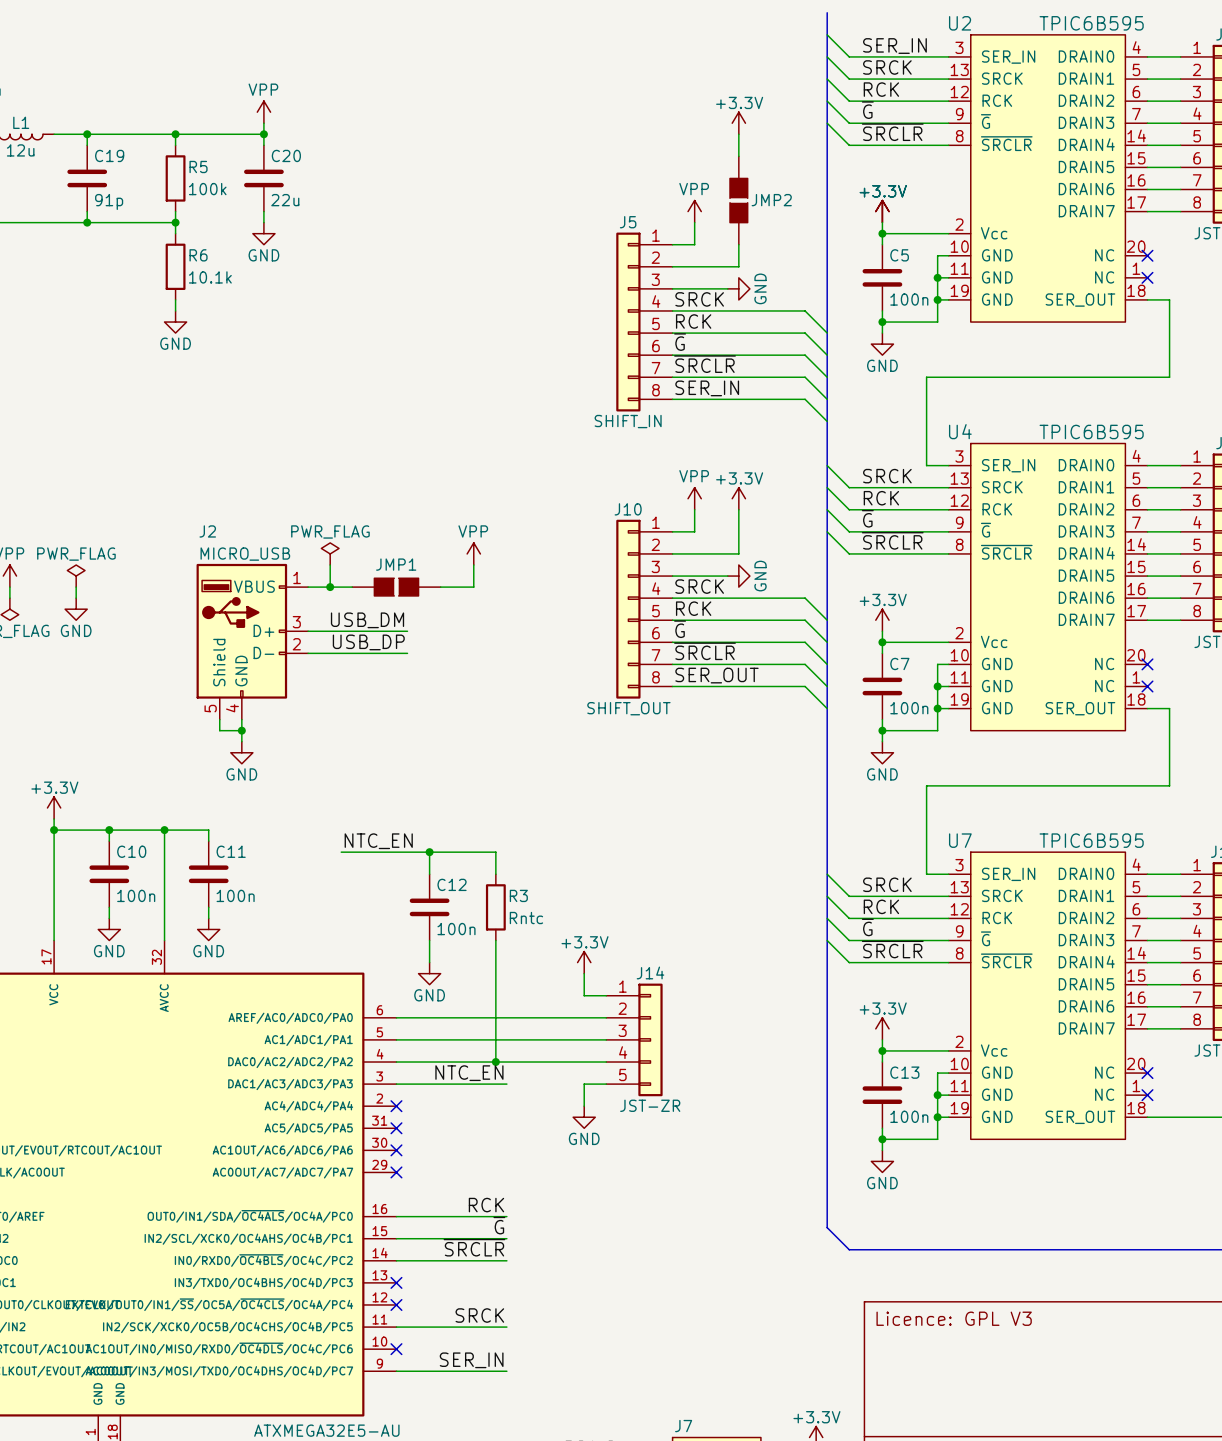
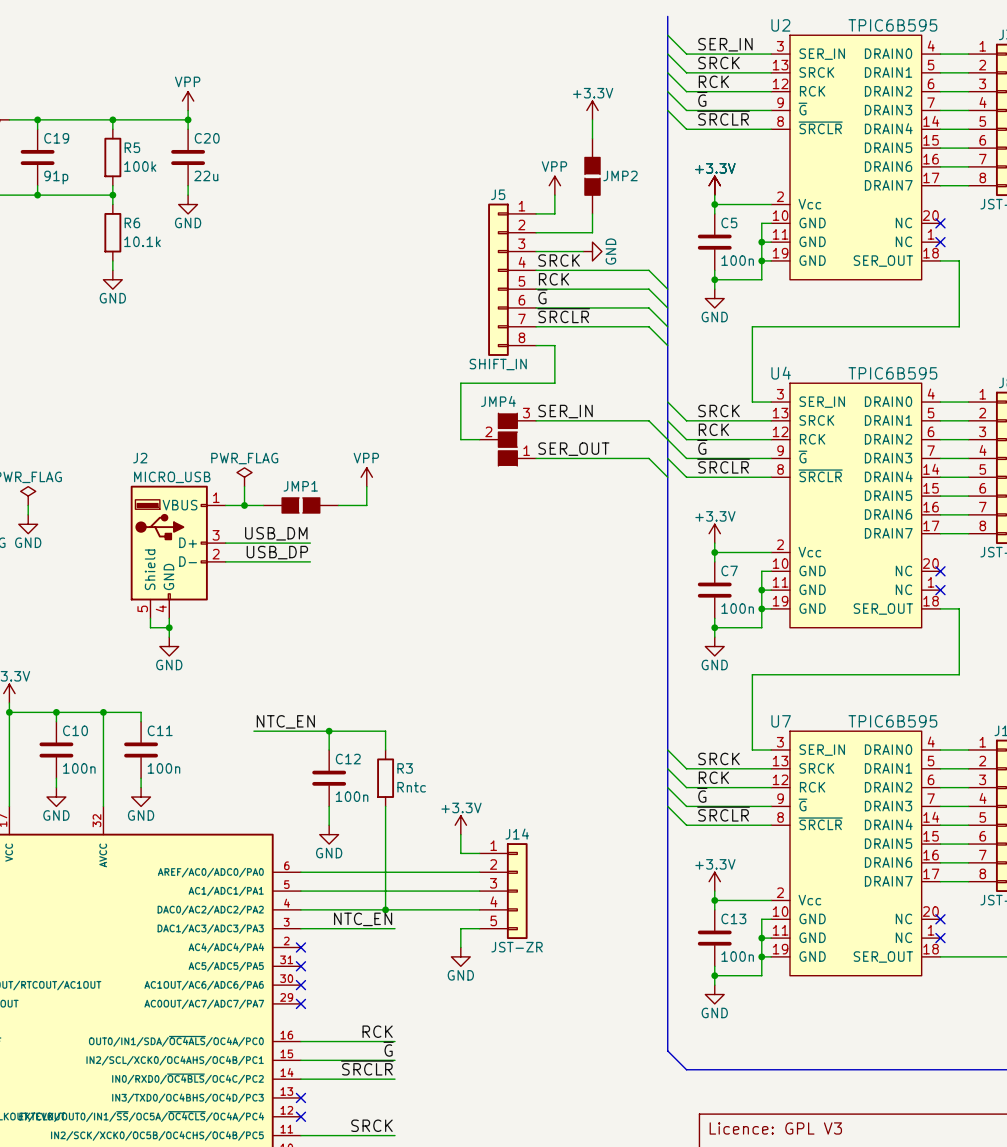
label position: SER_IN (707, 388) -> SER_IN (565, 411)
wire: (694, 399) (805, 399) (827, 421) -> (554, 345) (554, 383) (460, 383) (460, 439) (479, 439)
power symbol: VPP (694, 498) -> none
power symbol: +3.3V (738, 498) -> none
JMP4: none -> (507, 439)
wire: (694, 509) (694, 531) -> (667, 477) (648, 458) (554, 458)
wire: (738, 509) (738, 553) (672, 553) -> none
wire: (672, 576) (727, 576) -> none
power symbol: GND (738, 576) -> none
label: SRCK (699, 586) -> none
wire: (672, 598) (805, 598) (827, 620) -> (536, 420) (648, 420) (667, 439)
label: RCK (693, 608) -> none
J10: SHIFT_OUT (644, 609) -> none
wire: (672, 620) (805, 620) (827, 642) -> none
label: ~{G} (680, 629) -> none
wire: (672, 642) (805, 642) (827, 664) -> none
label: ~{SRCLR} (705, 651) -> none
wire: (672, 664) (805, 664) (827, 686) -> none
label position: SER_OUT (716, 675) -> SER_OUT (573, 449)
wire: (672, 686) (805, 686) (827, 708) -> none

